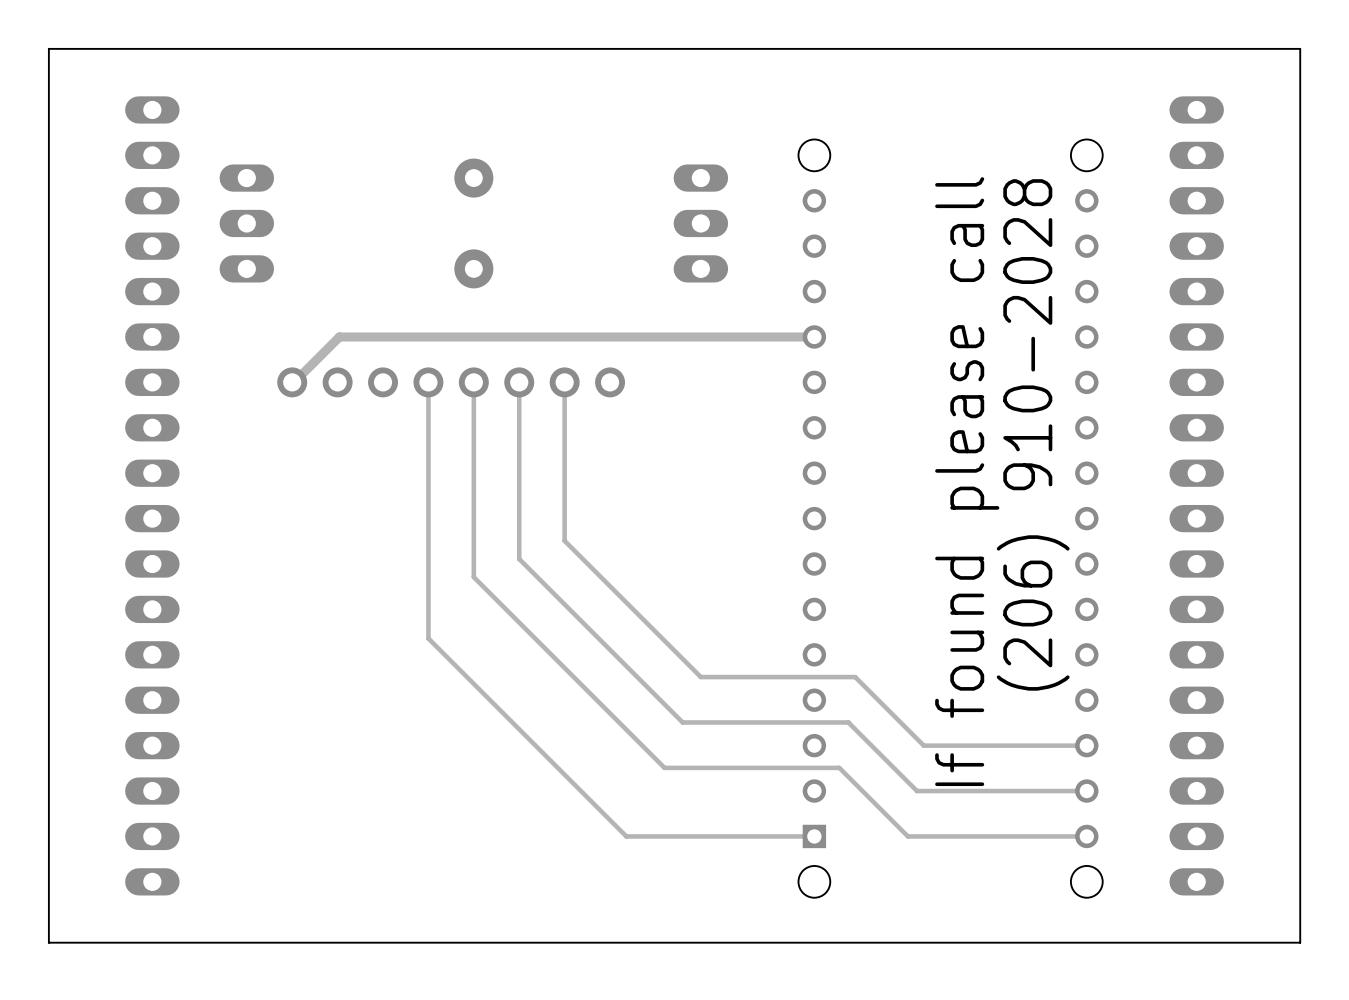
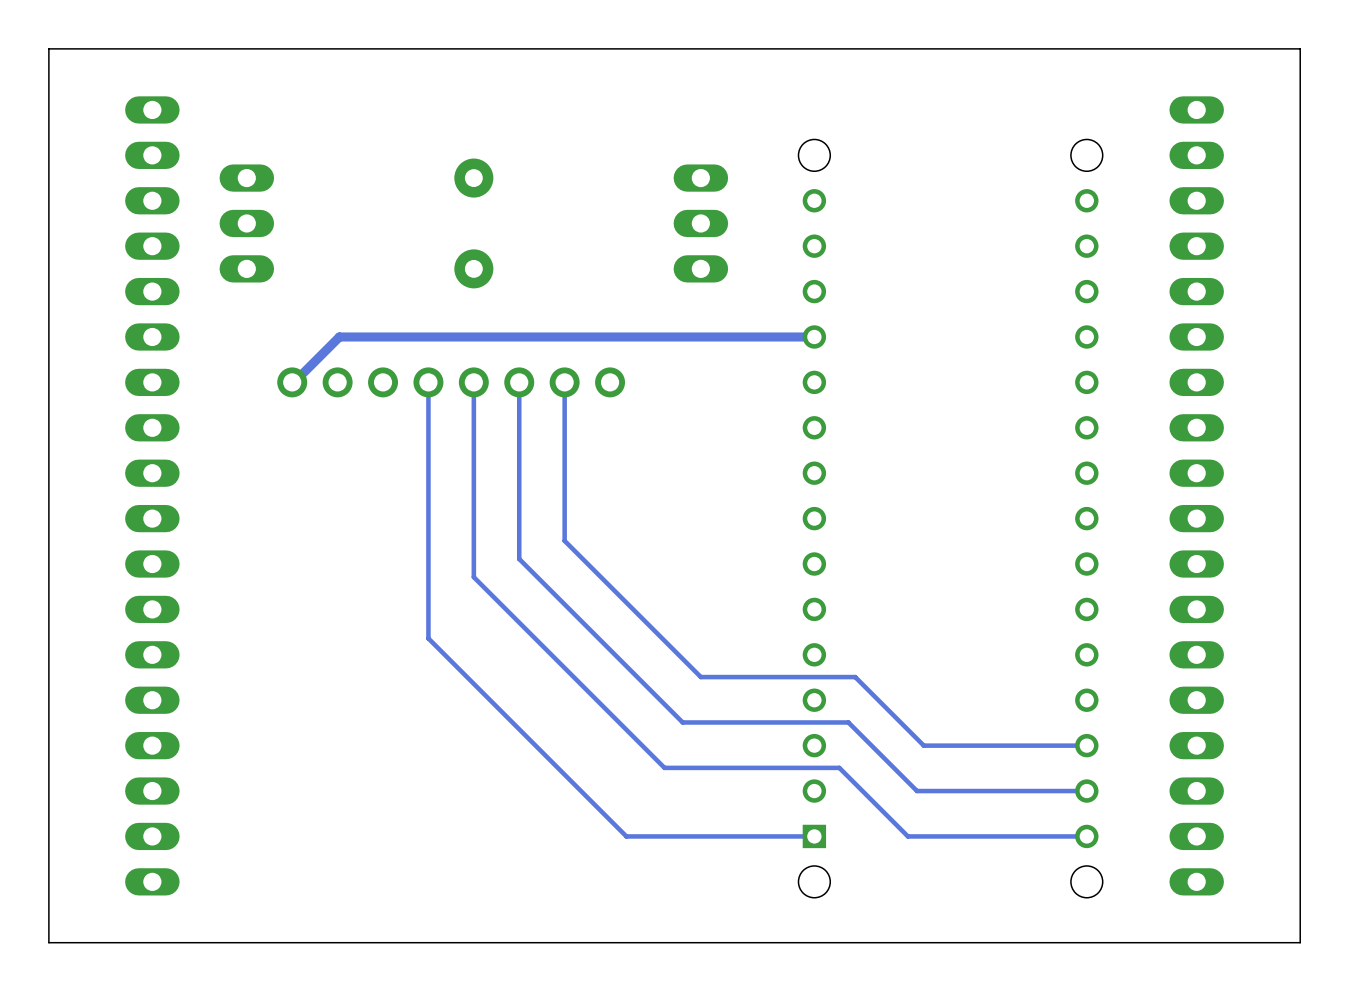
text: (206) 910-2028 (1033, 434) -> none
text: If found please call (967, 481) -> none

